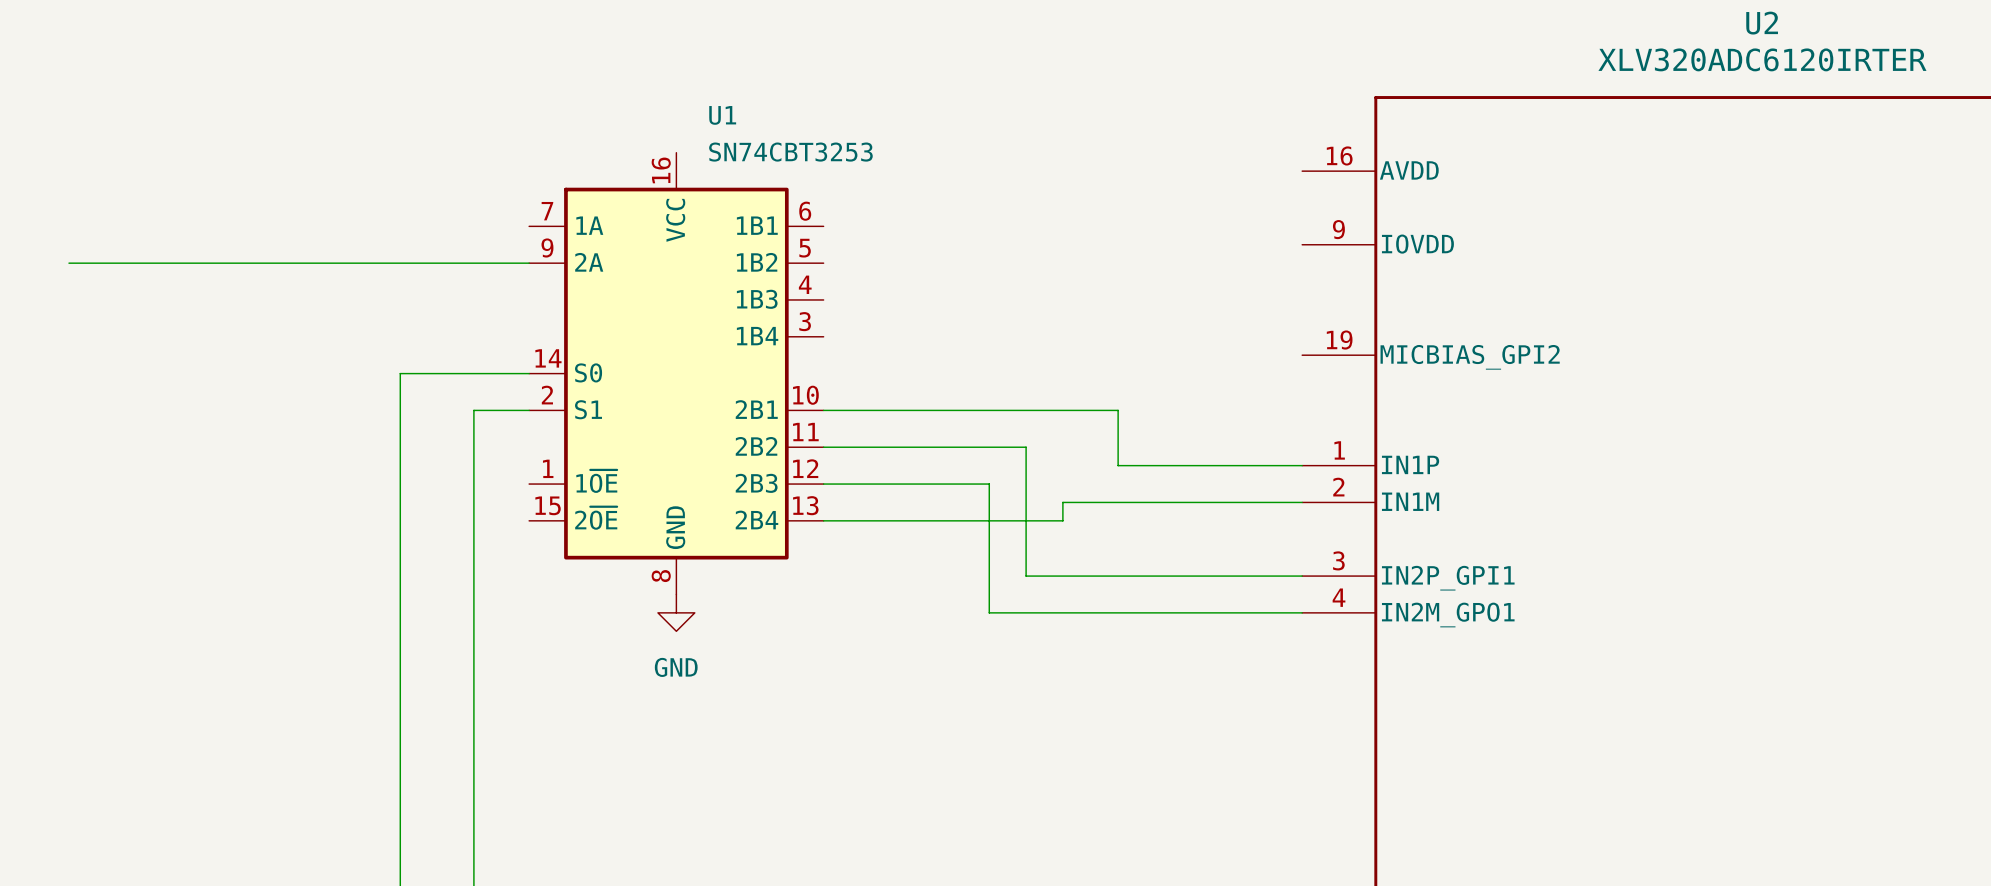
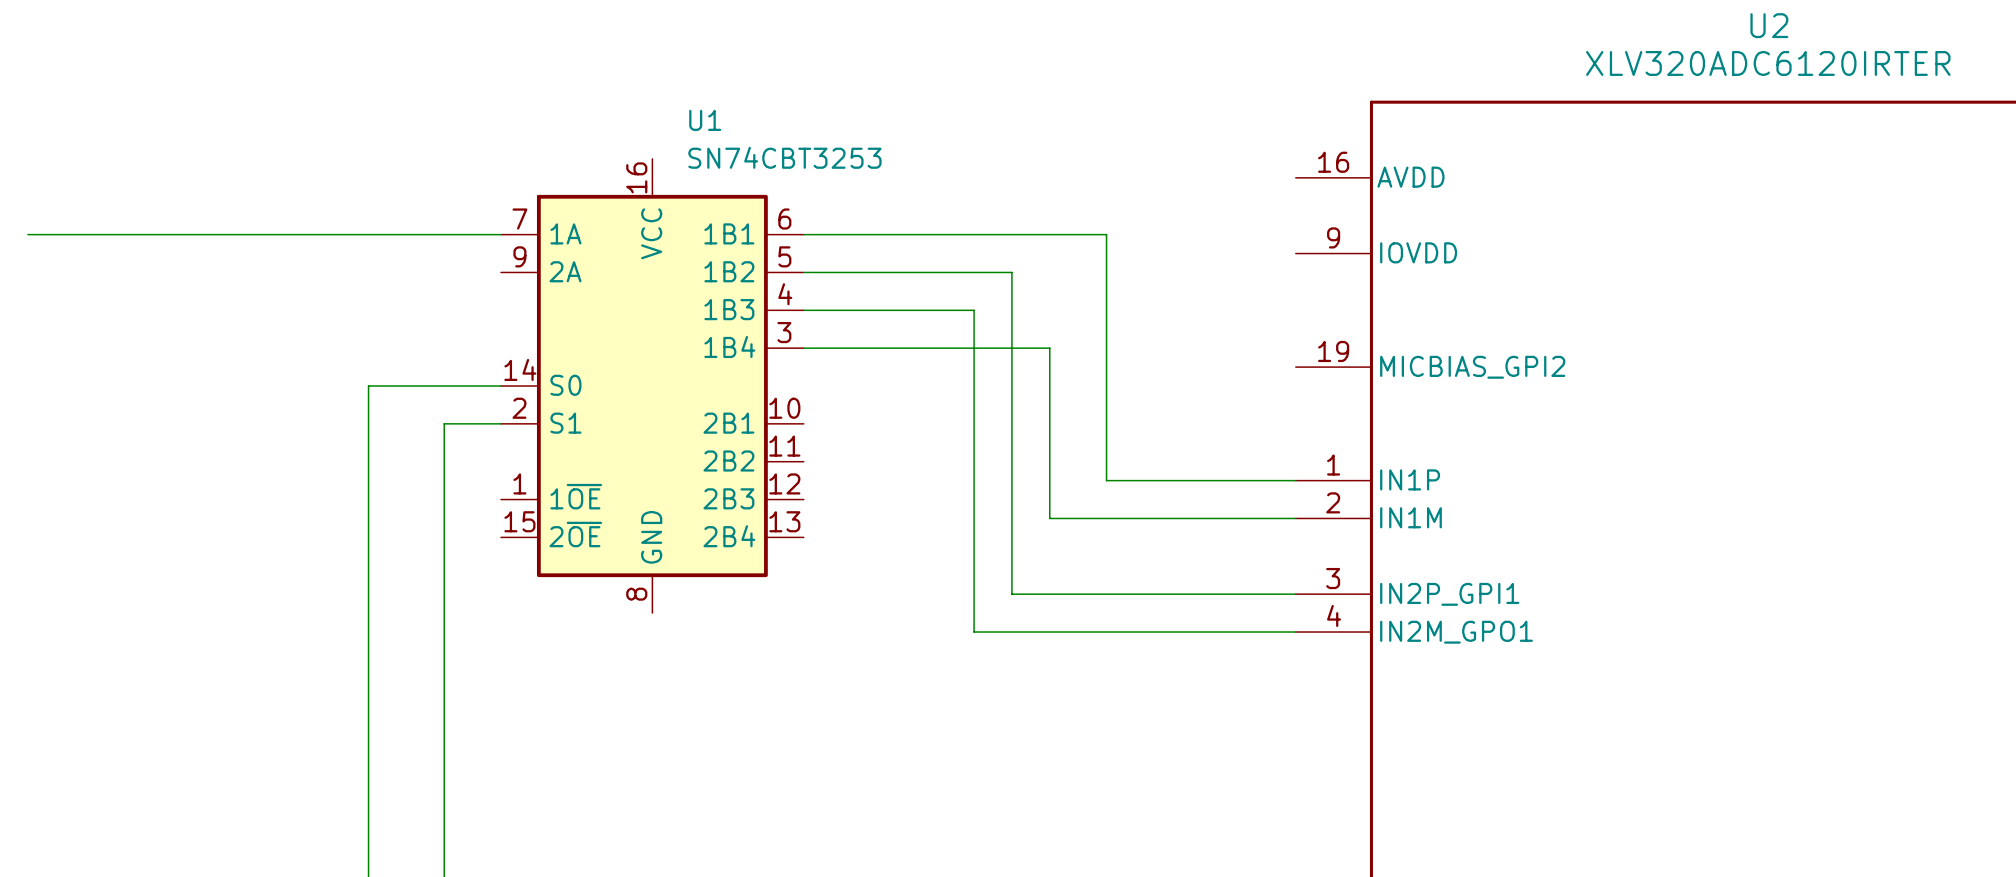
wire: (68, 263) (529, 263) -> (27, 234) (501, 234)
wire: (823, 410) (1118, 410) -> (803, 234) (1106, 234) (1106, 423)
wire: (823, 447) (1026, 447) -> (803, 272) (1011, 272) (1011, 461)
wire: (823, 484) (989, 484) -> (803, 310) (974, 310) (974, 499)
wire: (1062, 502) (1062, 520) (823, 520) -> (1049, 518) (1049, 348) (803, 348)
power symbol: GND (676, 612) -> none

